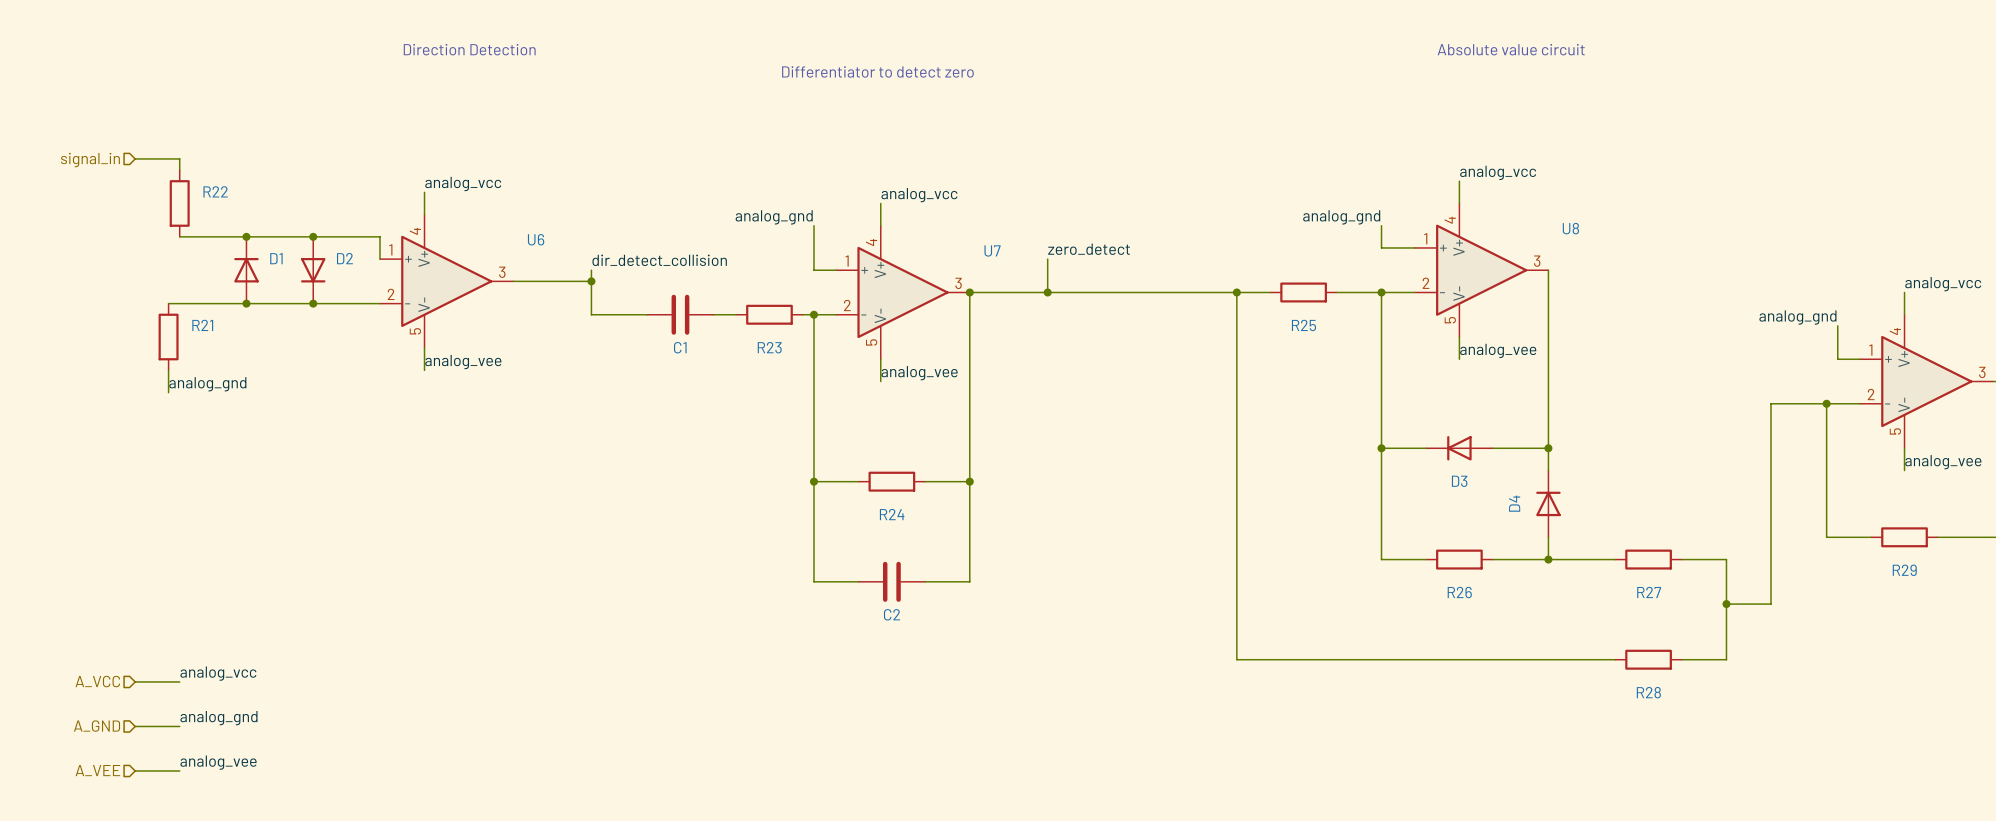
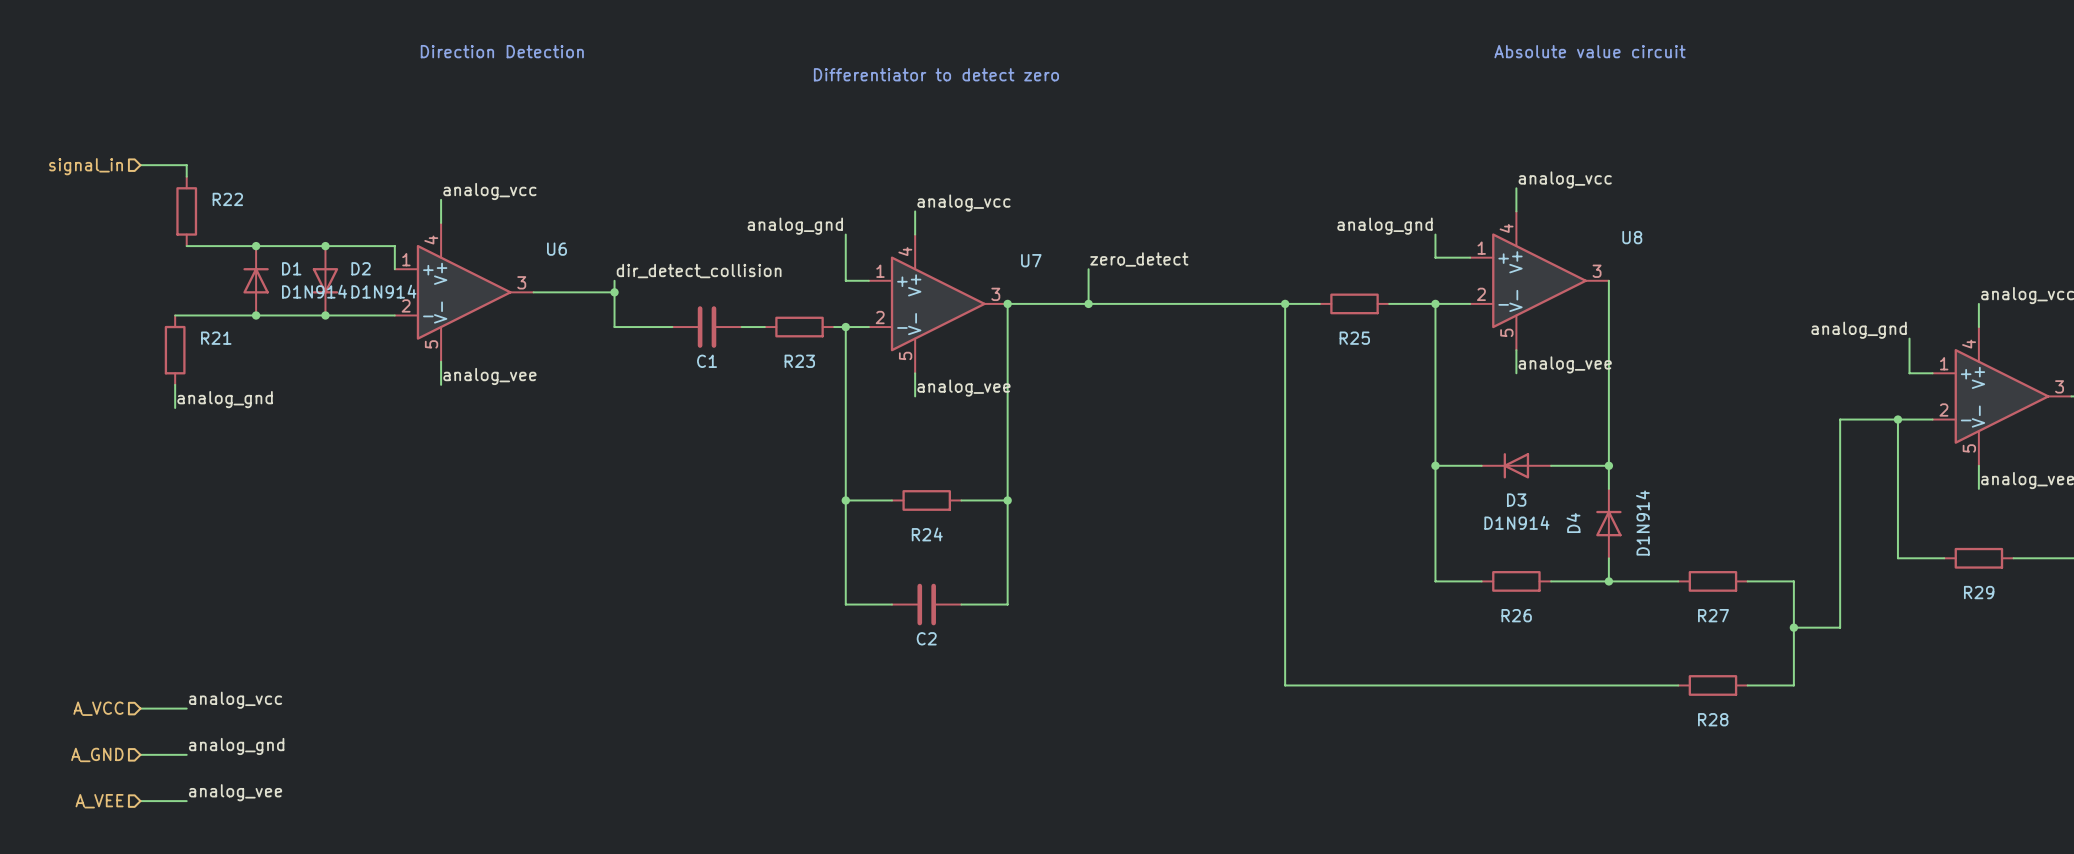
D1 value: none -> D1N914 (314, 291)
D2 value: none -> D1N914 (383, 291)
D3 value: none -> D1N914 (1516, 522)
D4 value: none -> D1N914 (1642, 523)

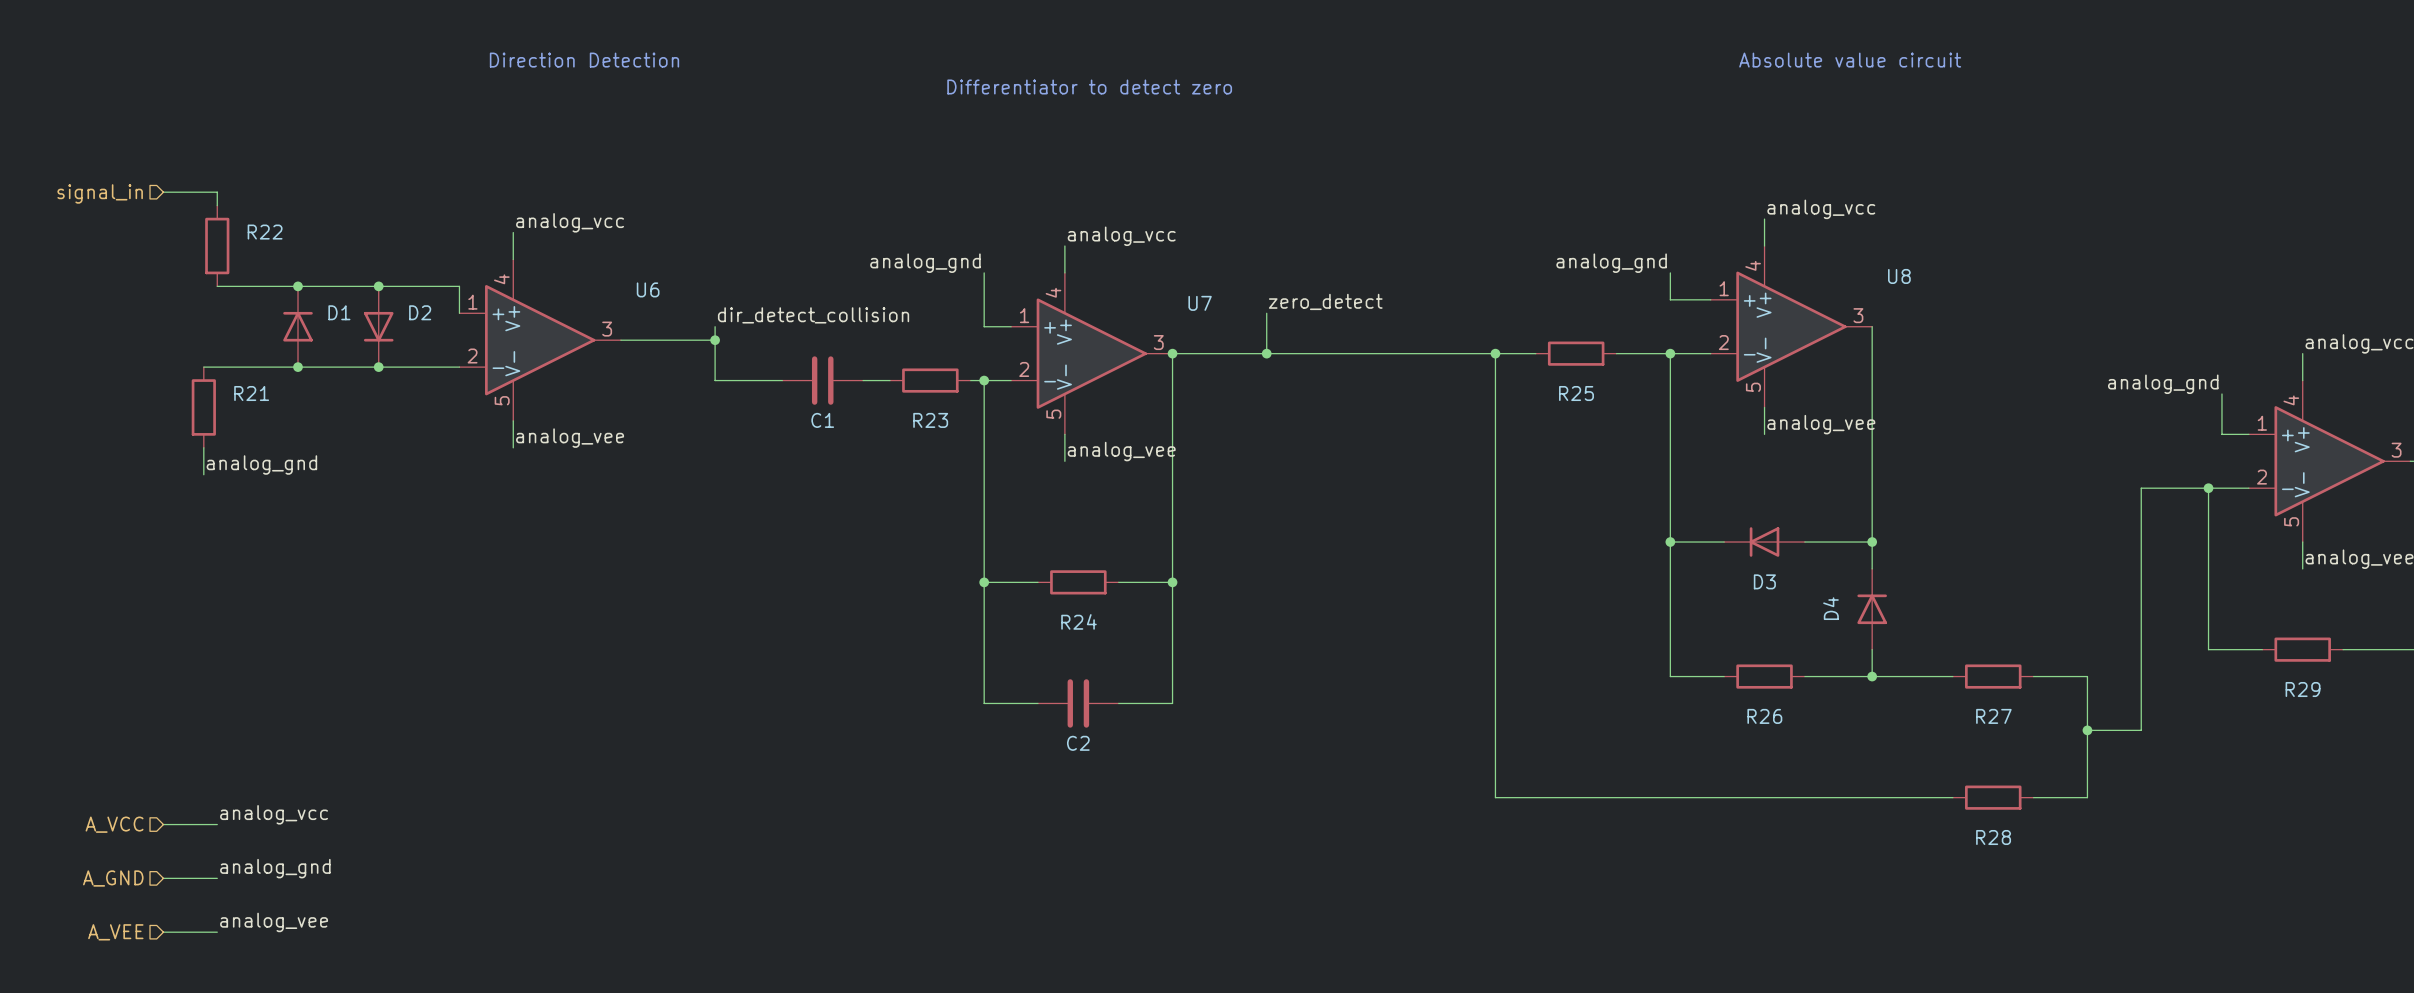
D1 value: D1N914 (314, 291) -> none
D2 value: D1N914 (383, 291) -> none
D3 value: D1N914 (1516, 522) -> none
D4 value: D1N914 (1642, 523) -> none

